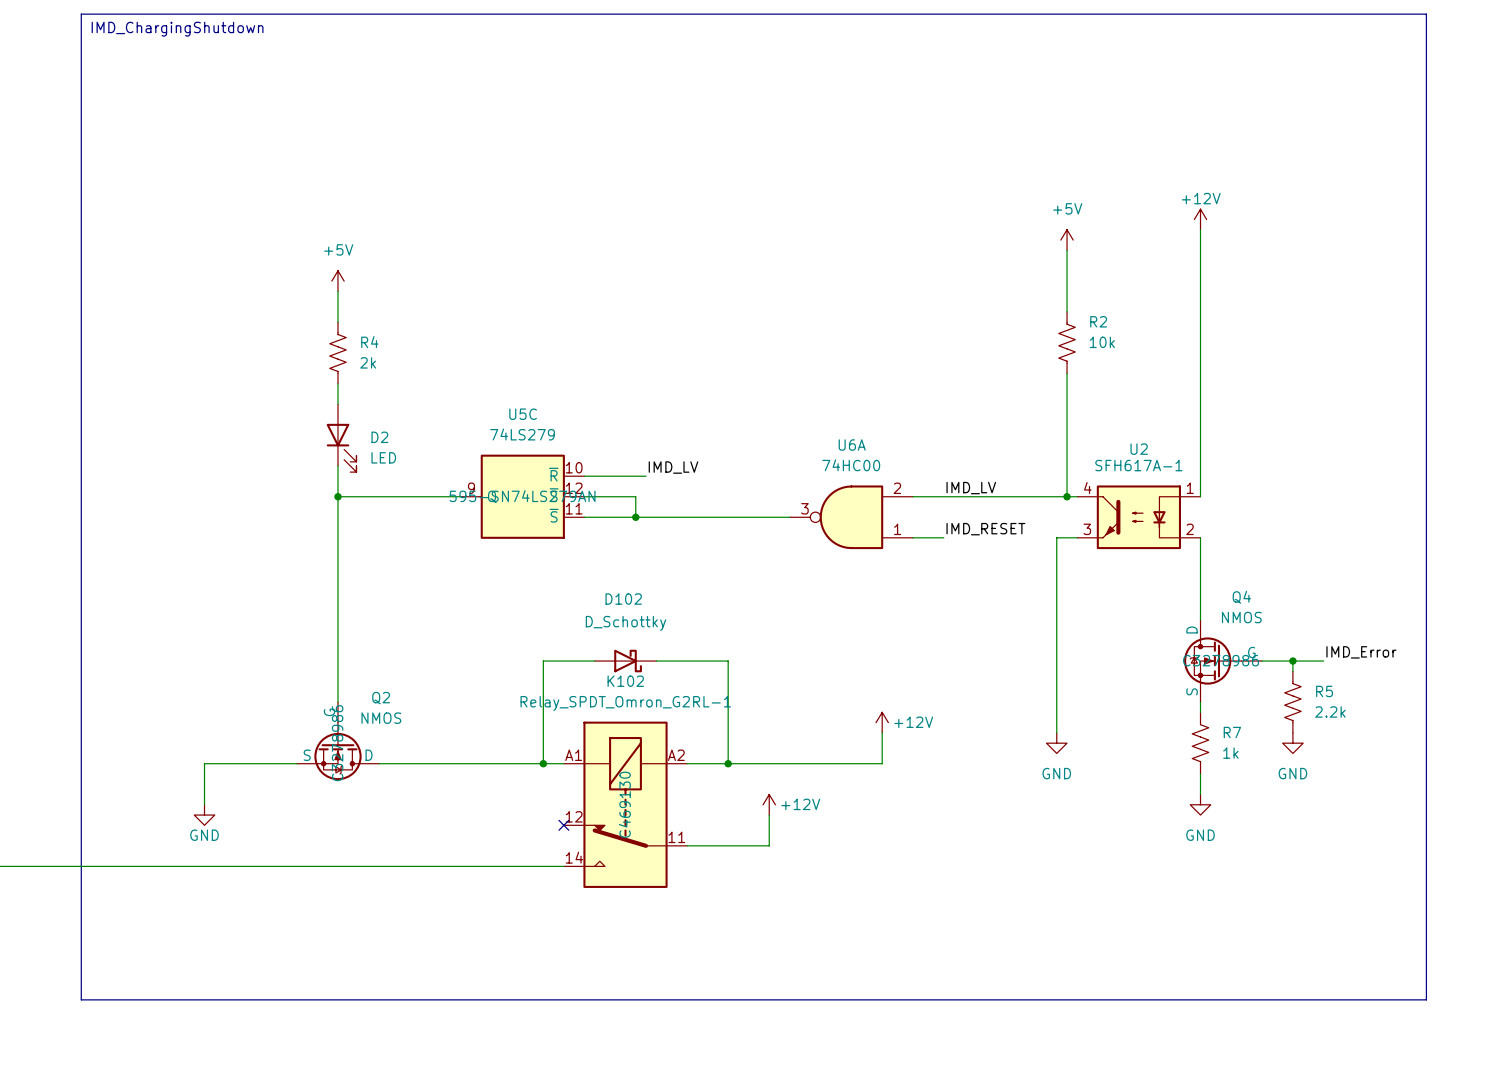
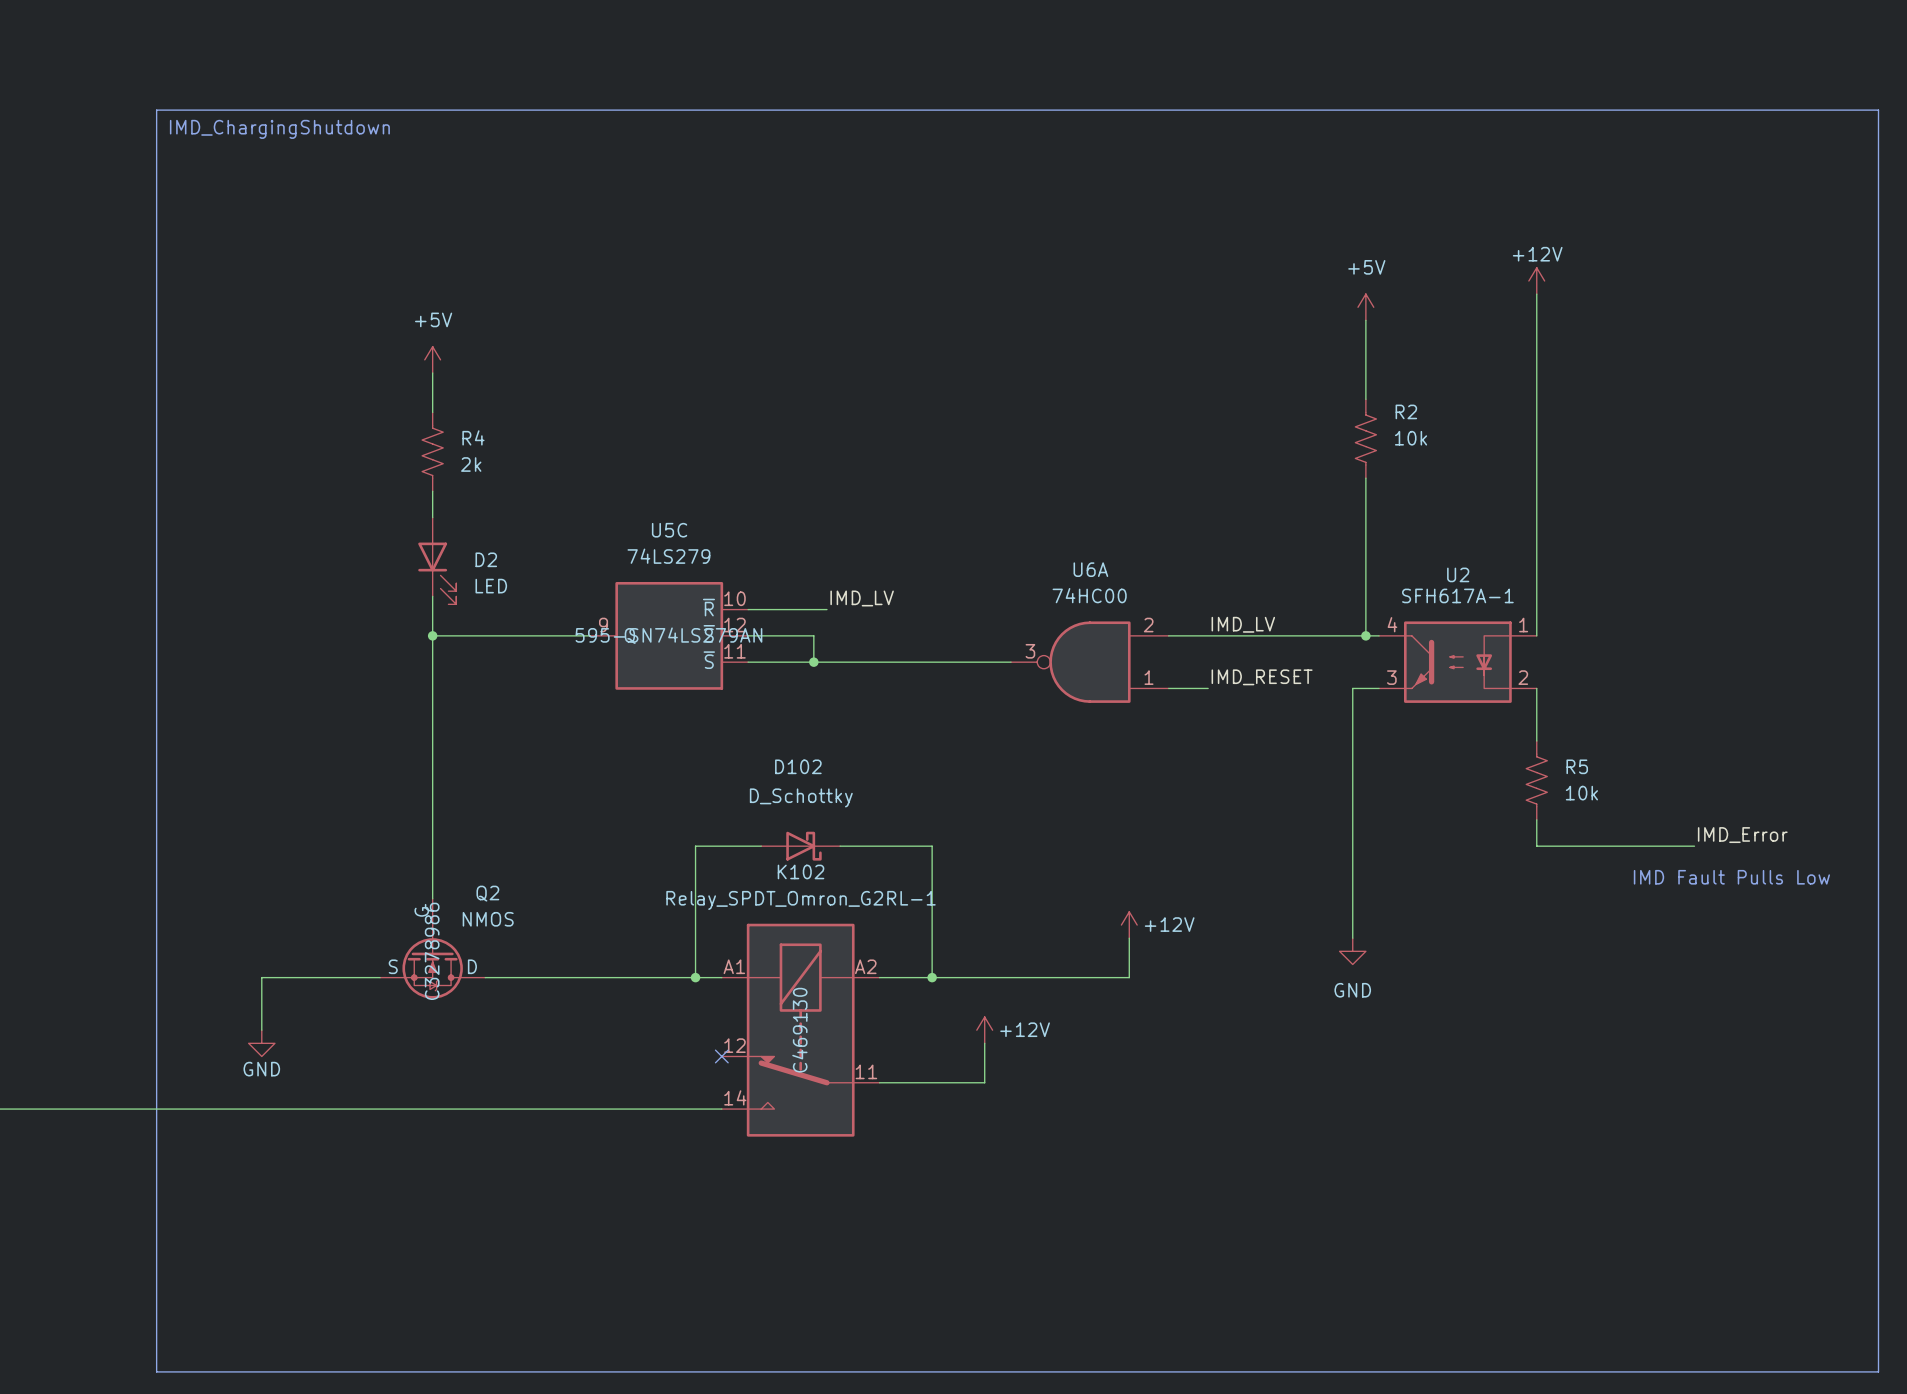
line: (81, 14) (1426, 14) (1426, 999) (81, 999) (81, 14) -> (156, 110) (1878, 110) (1878, 1371) (156, 1371) (156, 110)
text position: IMD_ChargingShutdown (177, 29) -> IMD_ChargingShutdown (279, 129)
wire: (1200, 578) (1200, 619) -> none
Q4: NMOS (1223, 661) -> none
wire: (1292, 661) (1292, 671) -> none
junction: (1292, 661) -> none
text: none -> IMD Fault Pulls Low (1731, 877)
wire: (1200, 702) (1200, 712) -> none
R5 position: (1292, 702) -> (1536, 780)
R5 value: 2.2k (1330, 711) -> 10k (1581, 793)
R7: 1k (1200, 743) -> none
power symbol: GND (1292, 743) -> none
wire: (1200, 773) (1200, 794) -> none
power symbol: GND (1200, 804) -> none

